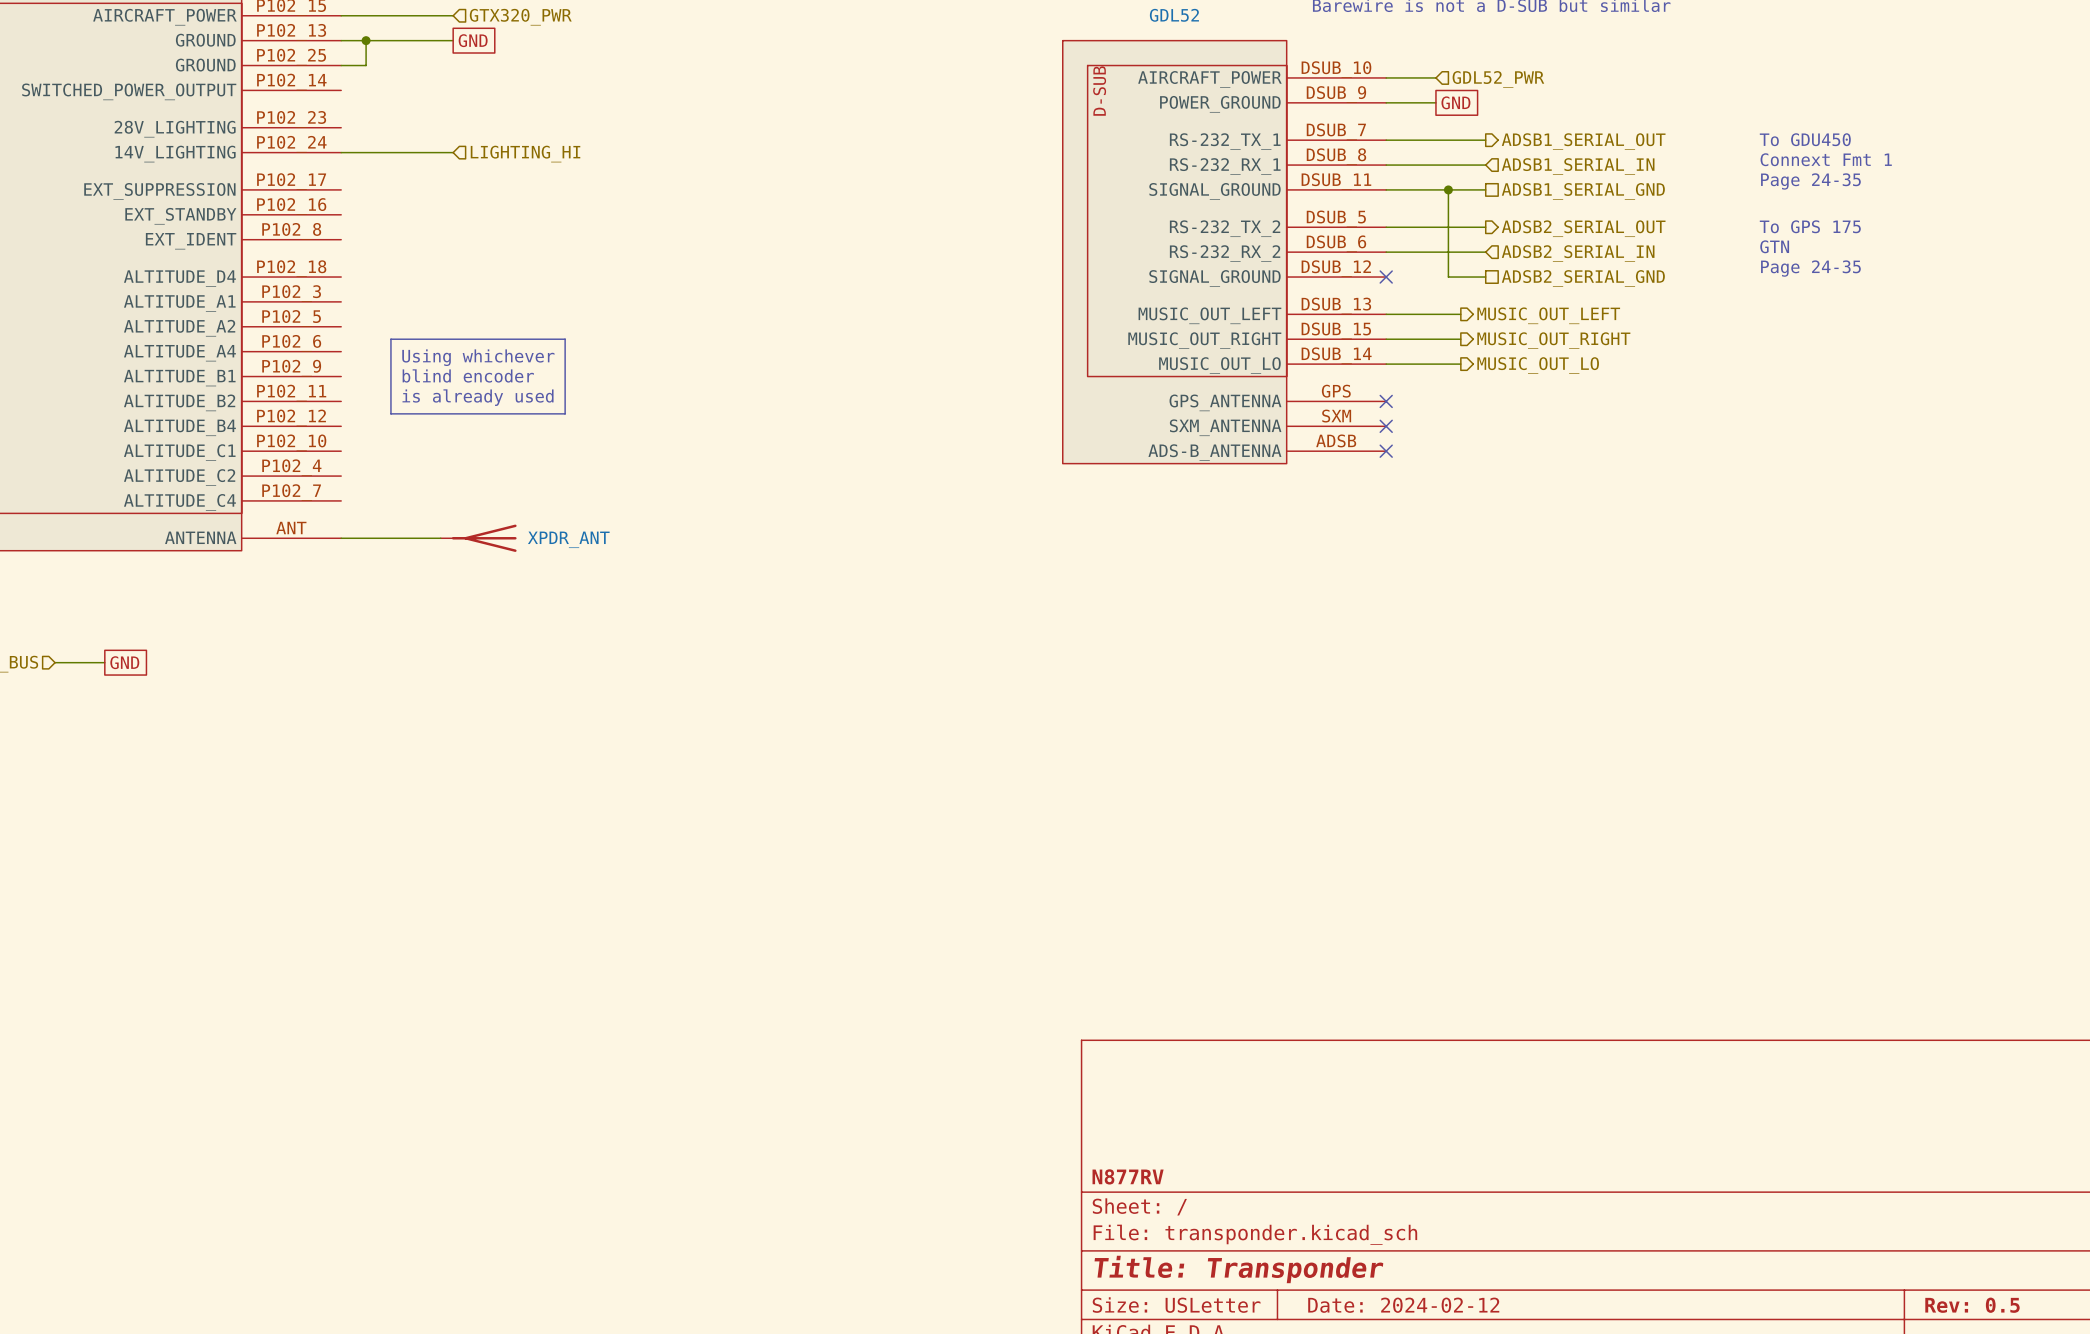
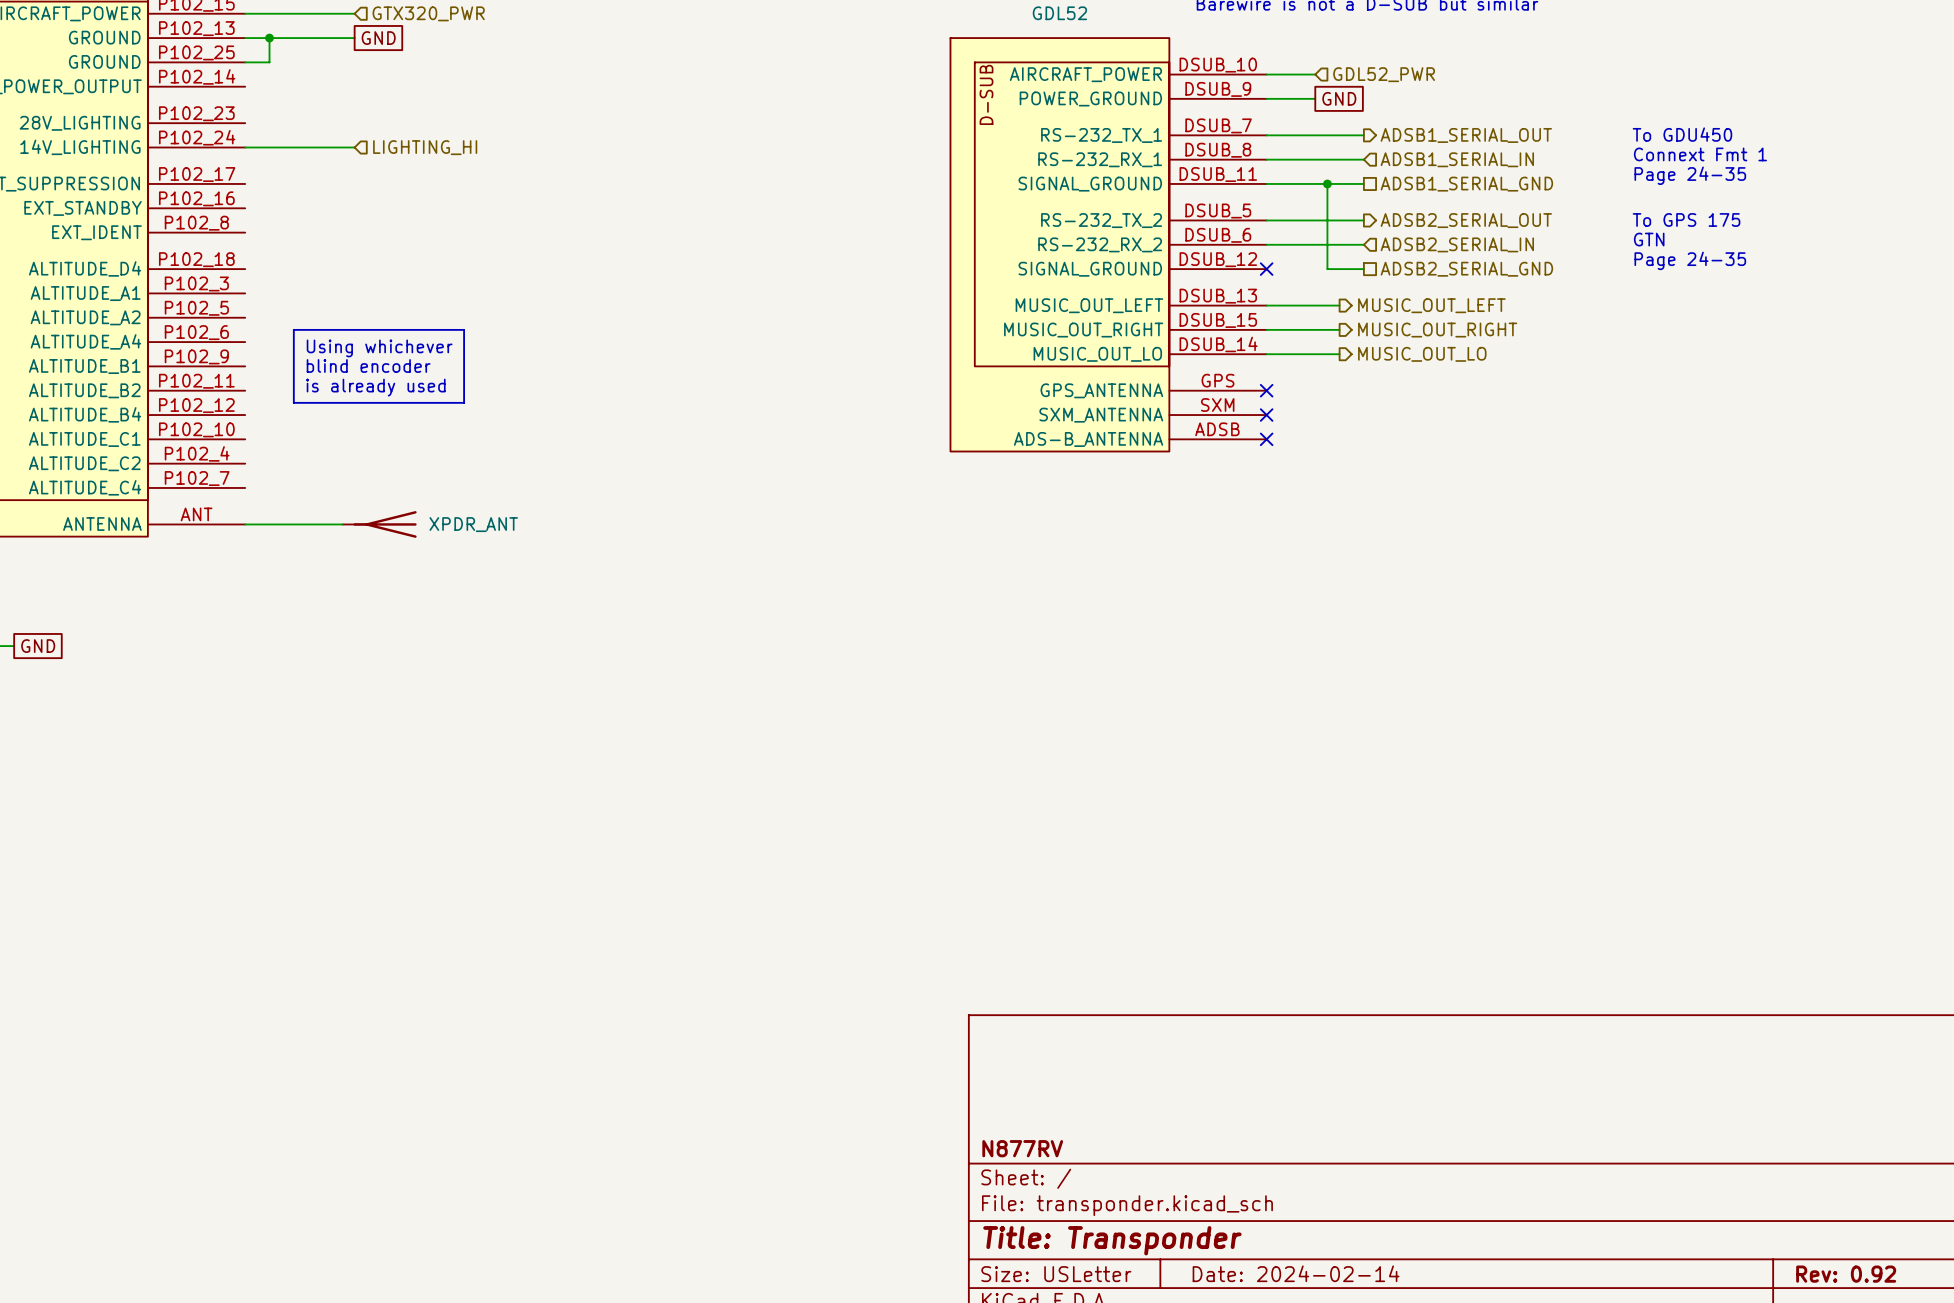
title block: Date: 2024-02-12 (1403, 1305) -> Date: 2024-02-14 (1296, 1273)
title block: Rev: 0.5 (1972, 1305) -> Rev: 0.92 (1846, 1274)

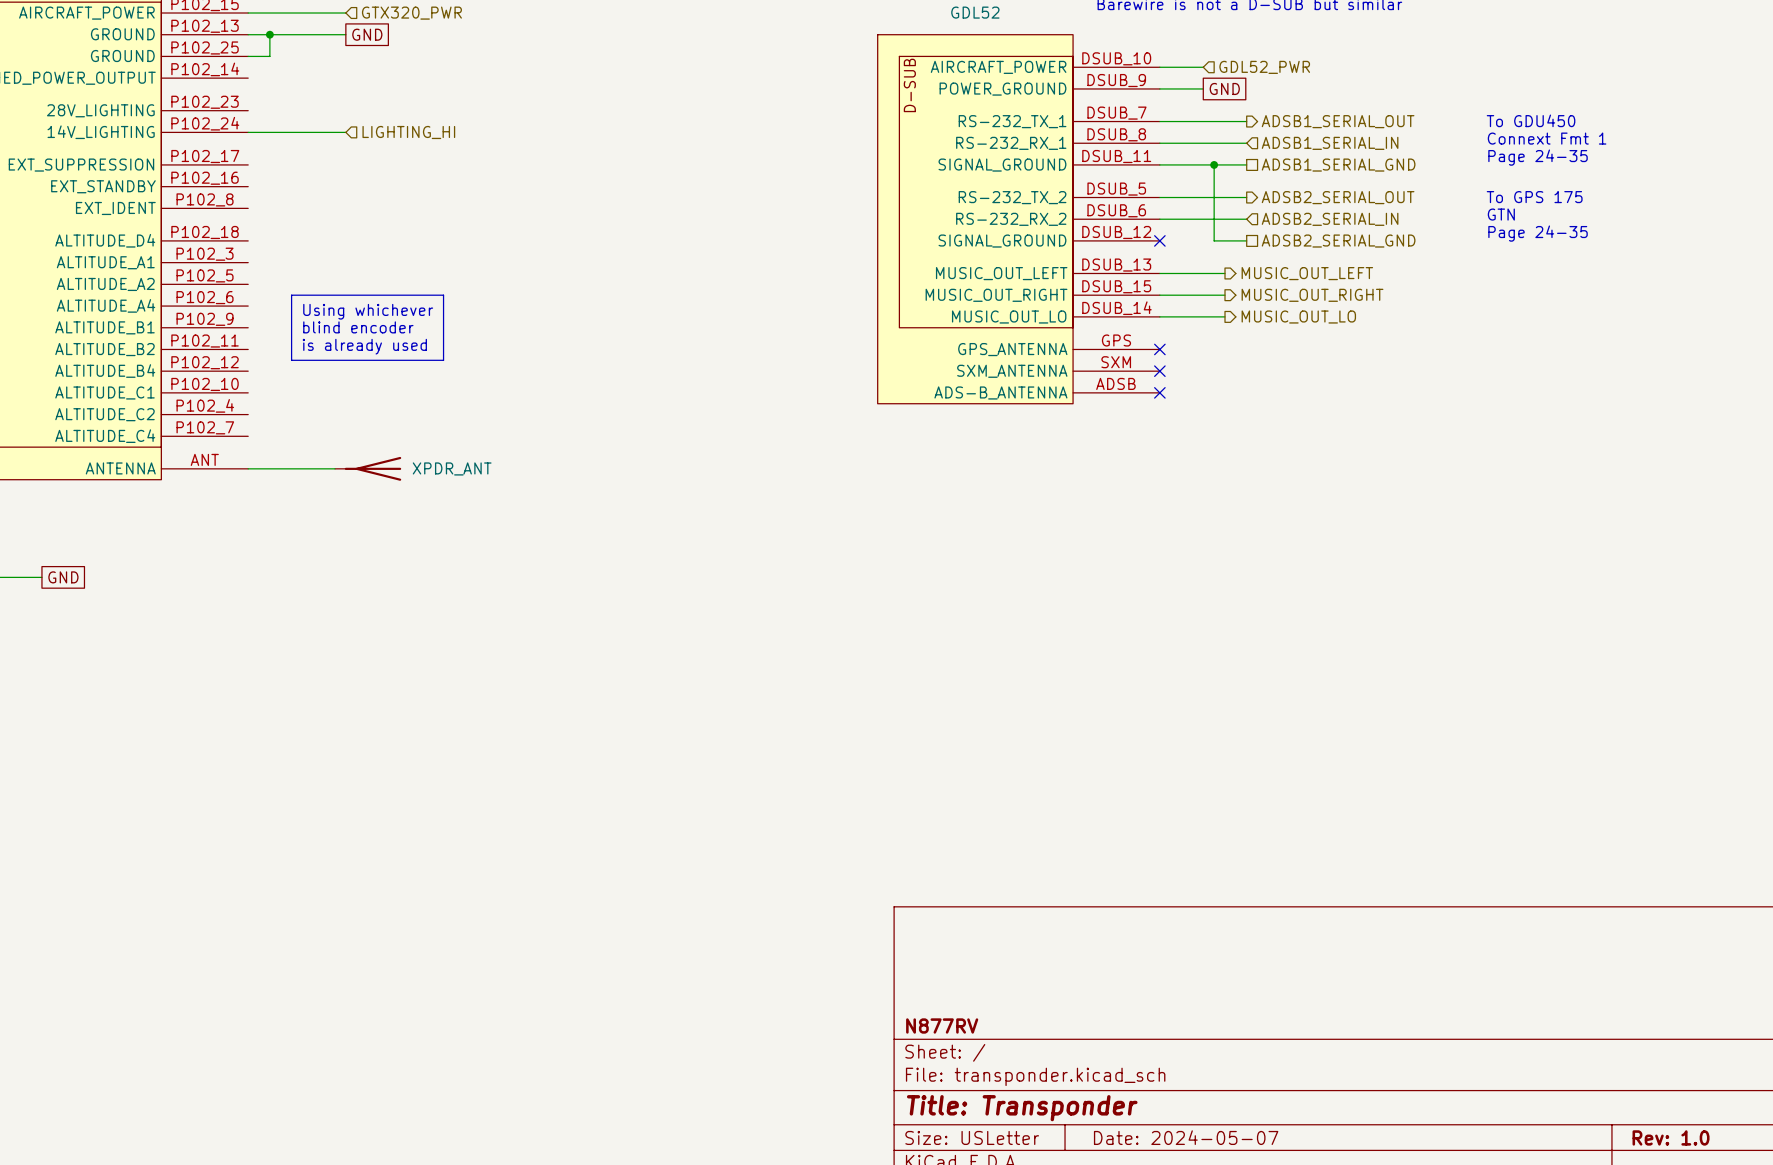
title block: Date: 2024-02-14 (1296, 1273) -> Date: 2024-05-07 (1186, 1137)
title block: Rev: 0.92 (1846, 1274) -> Rev: 1.0 (1671, 1137)

